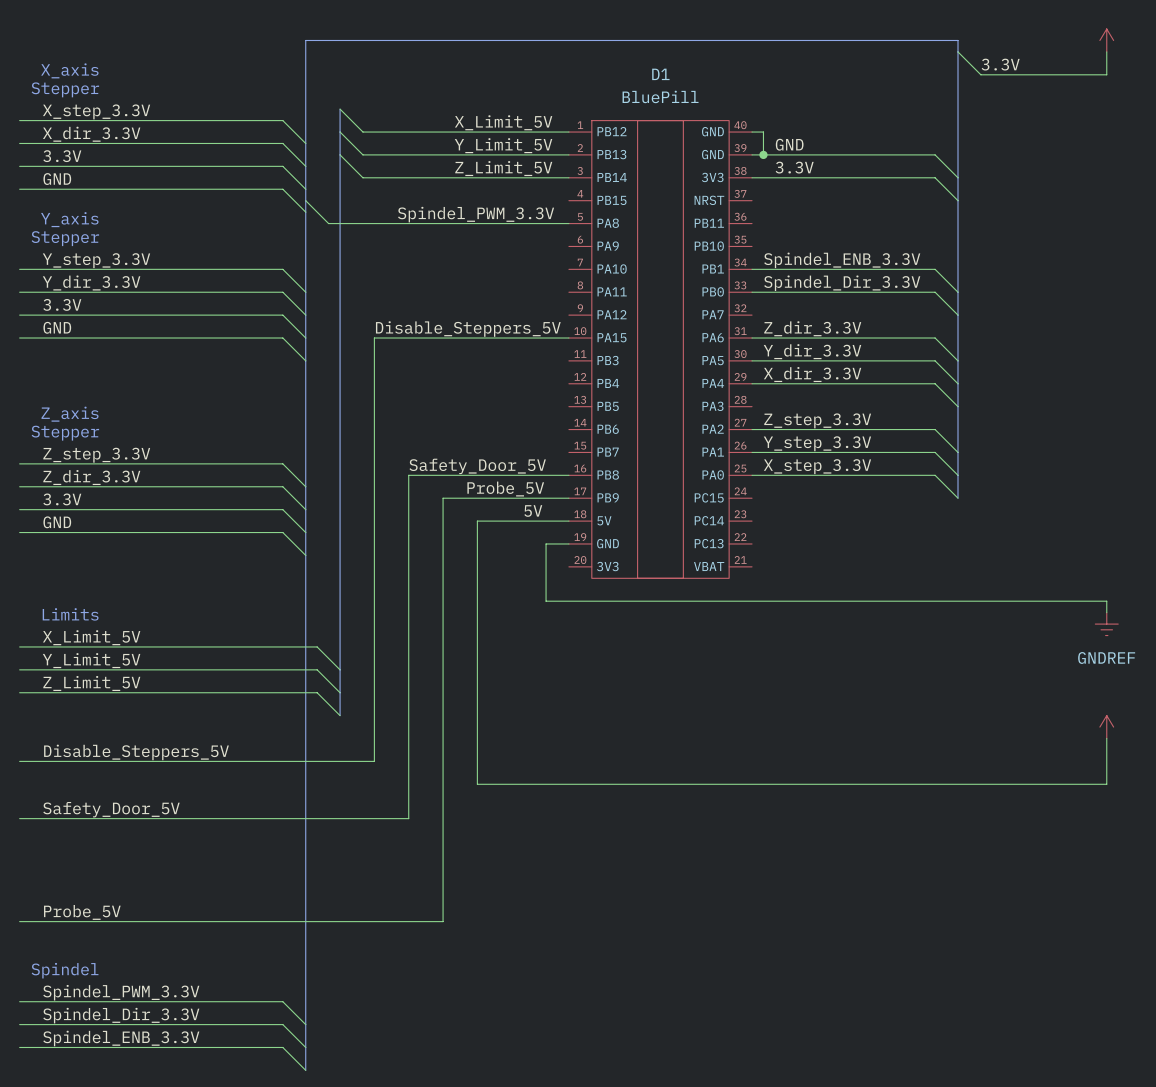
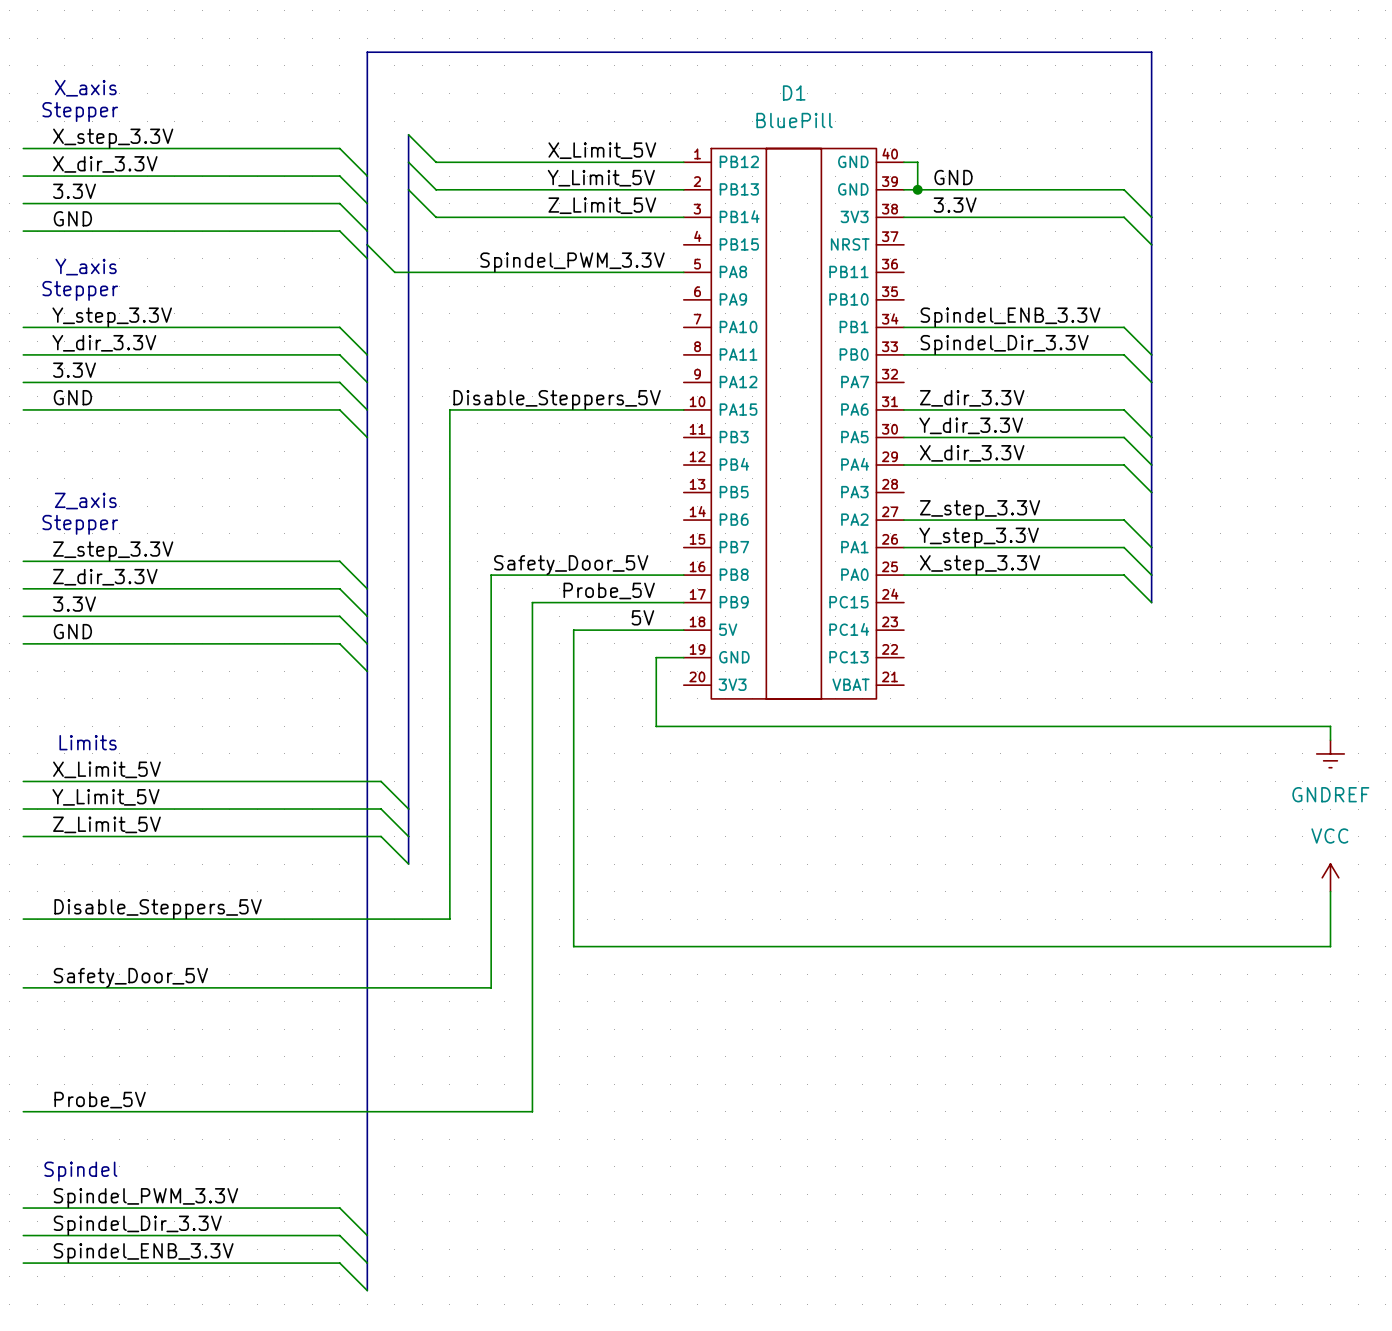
power symbol: (1106, 40) -> none
wire: (958, 51) (980, 74) (1106, 74) (1106, 51) -> none
label: 3.3V (1000, 64) -> none
power symbol text: none -> VCC (1329, 836)

